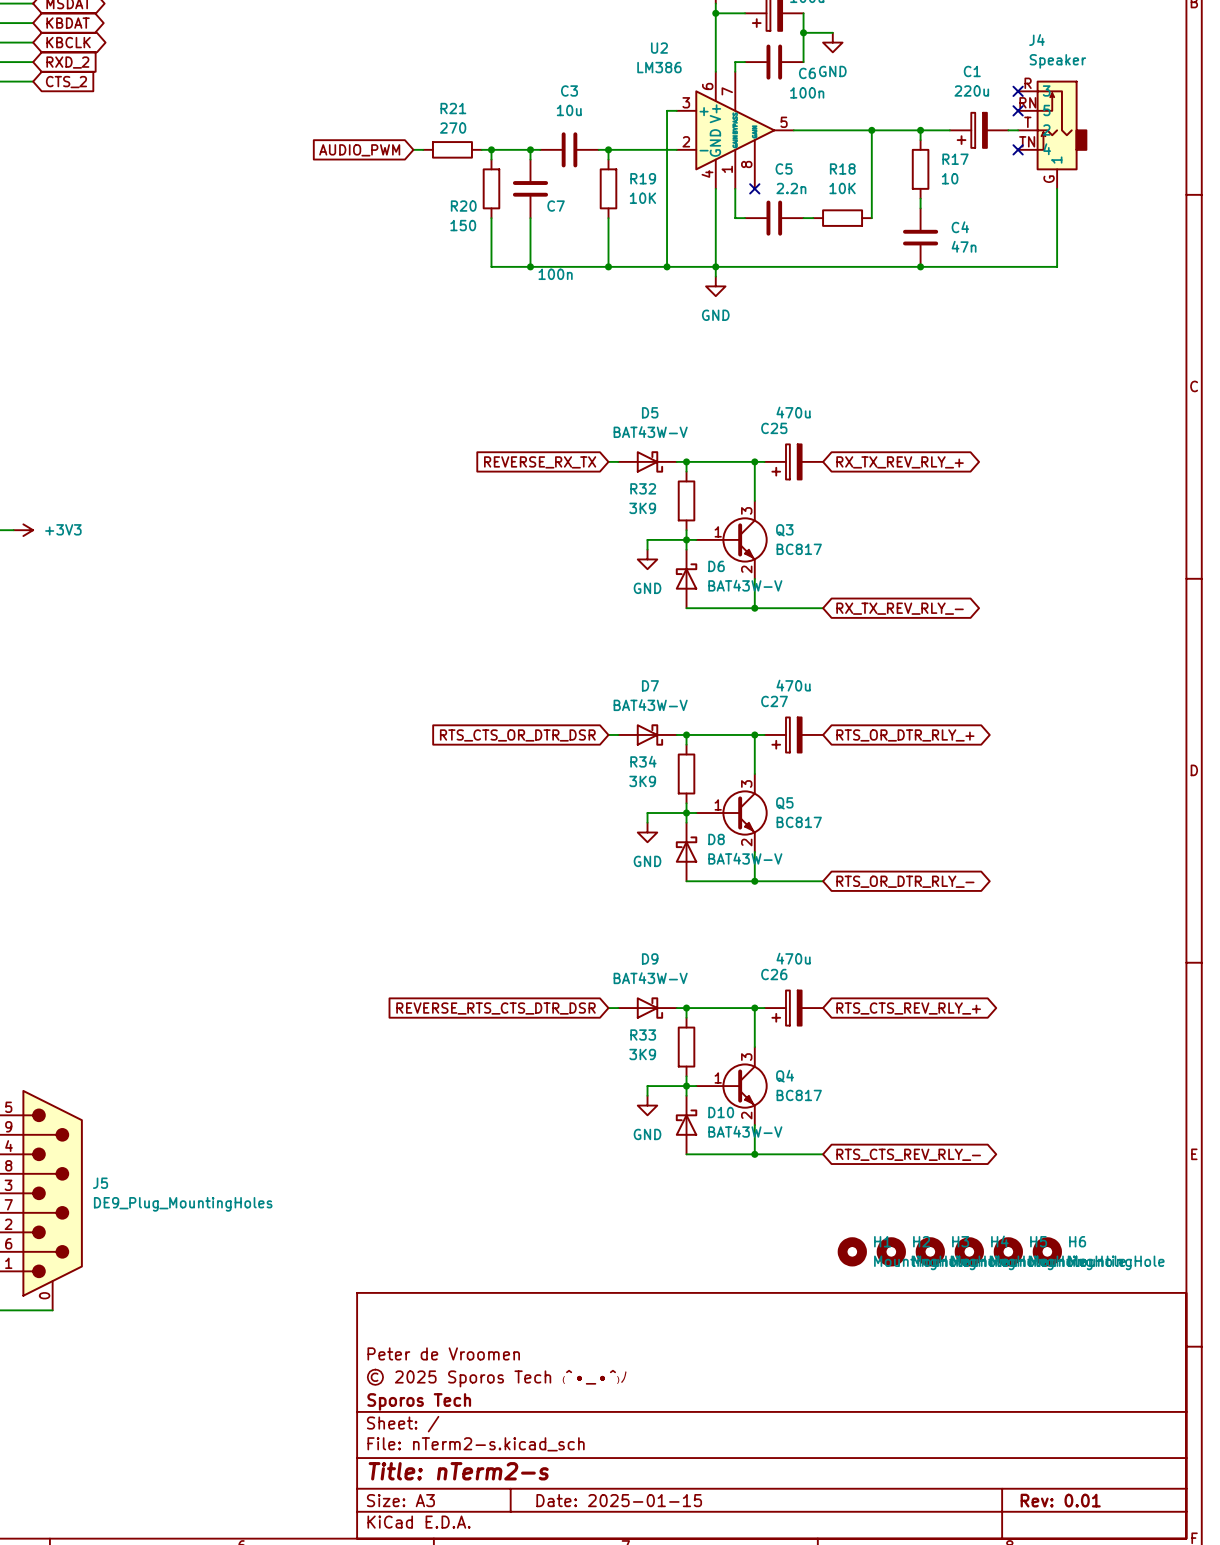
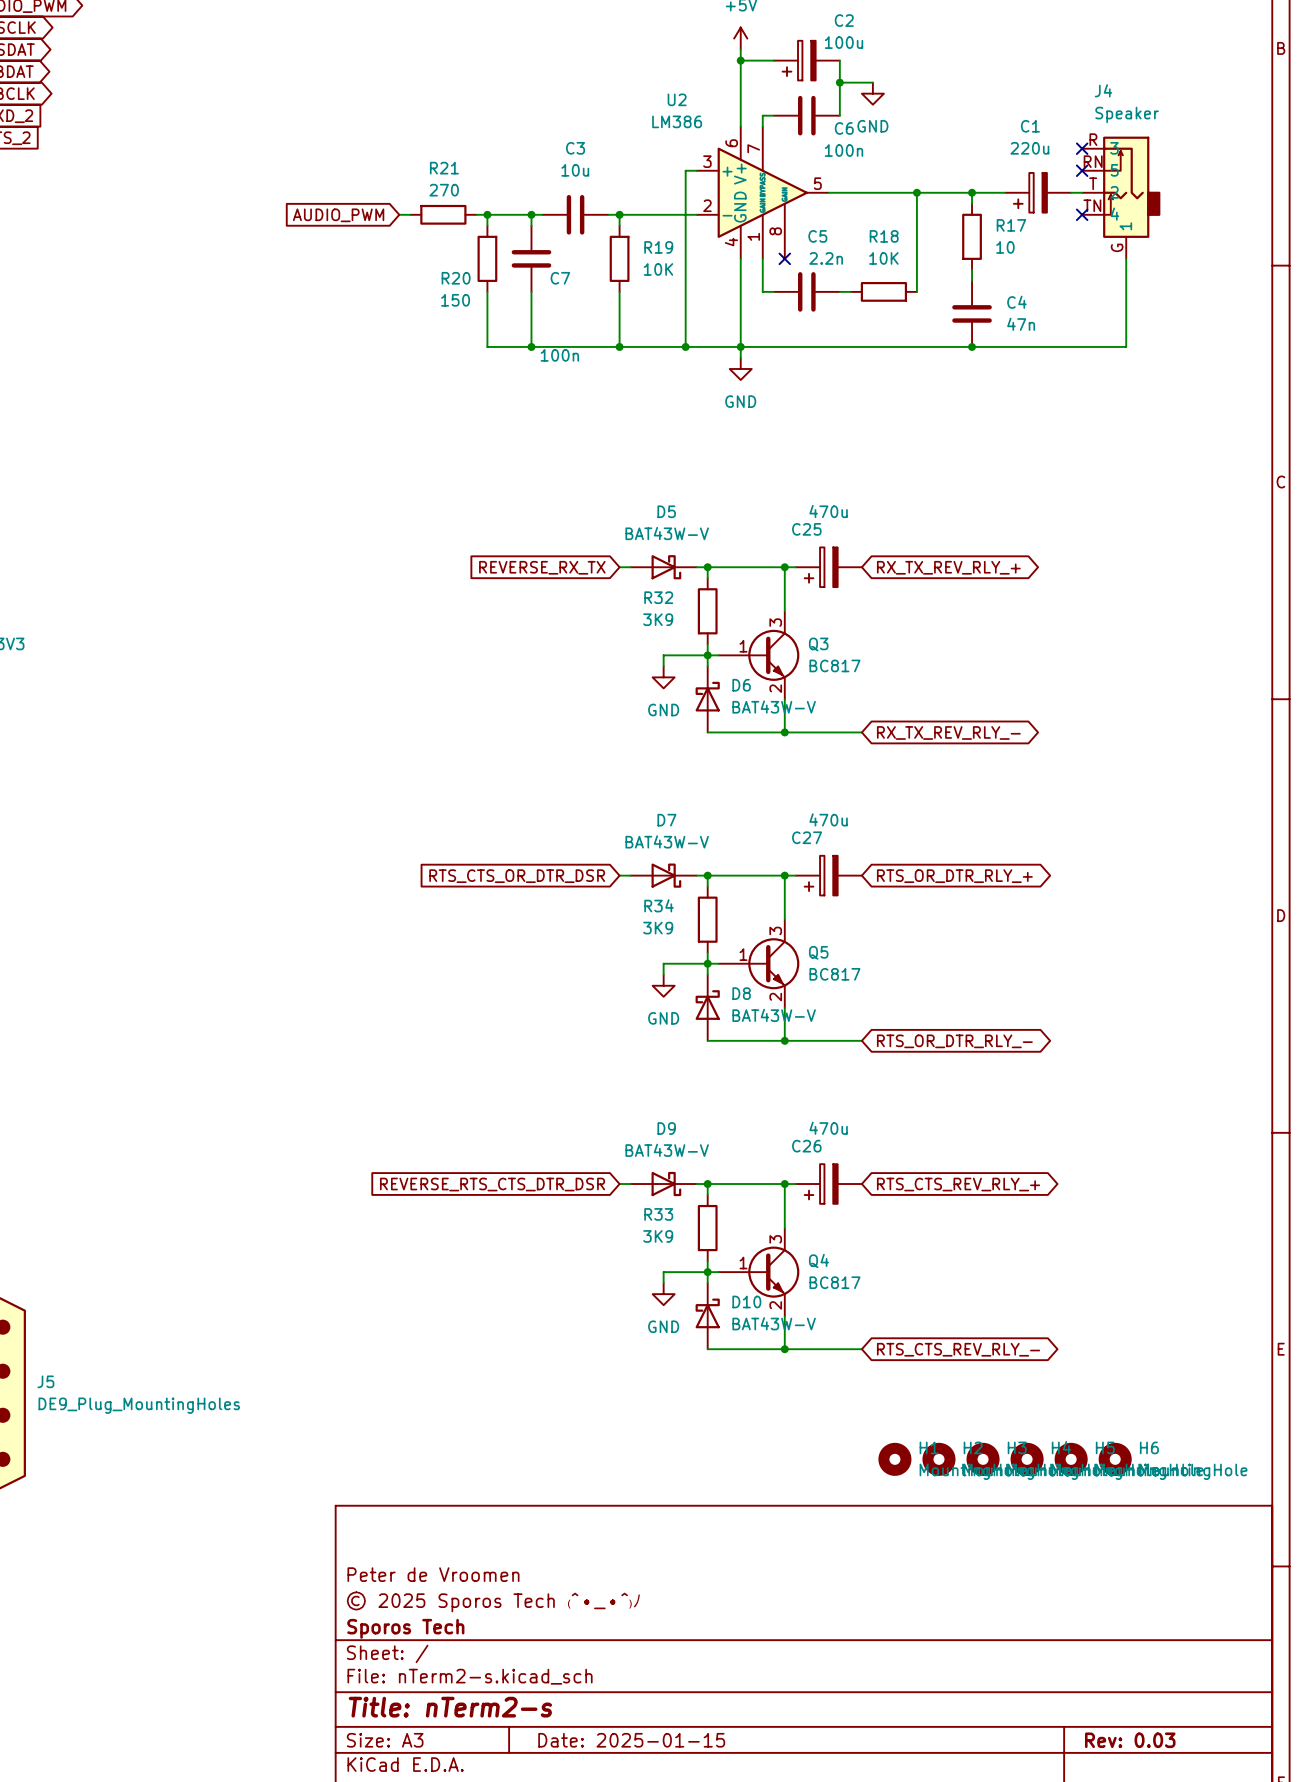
title block: Rev: 0.01 (1060, 1500) -> Rev: 0.03 (1130, 1740)

